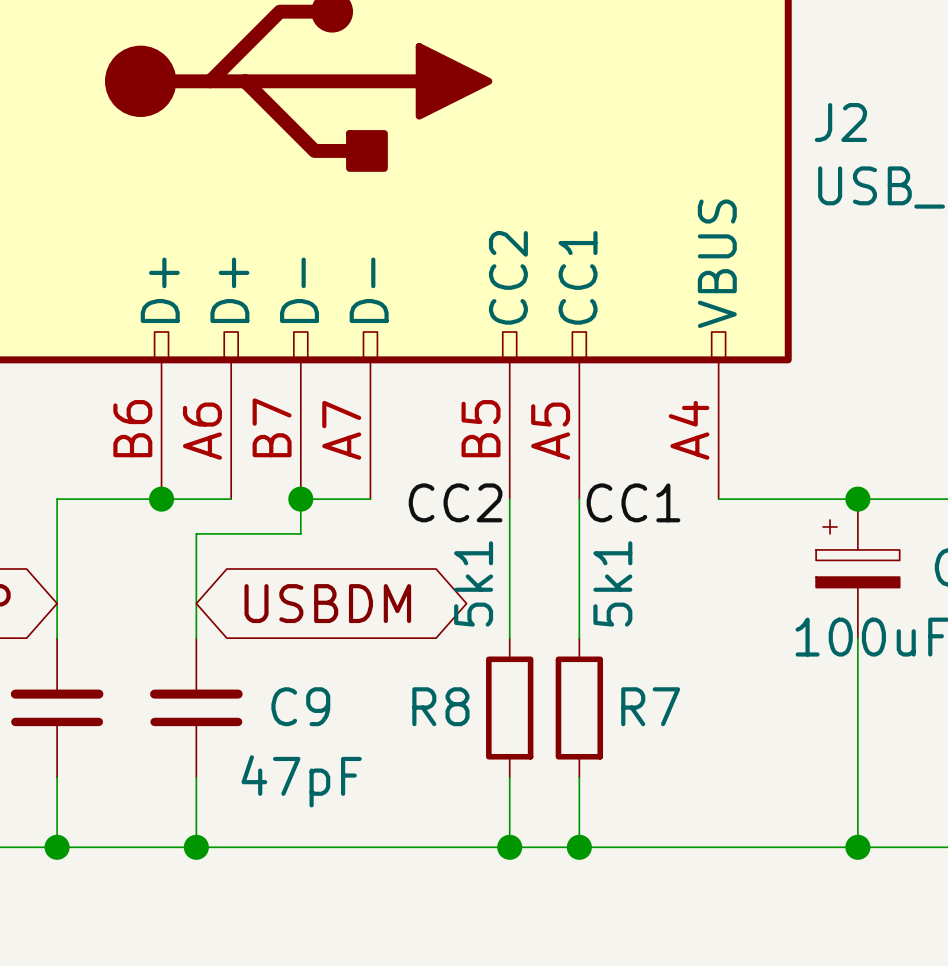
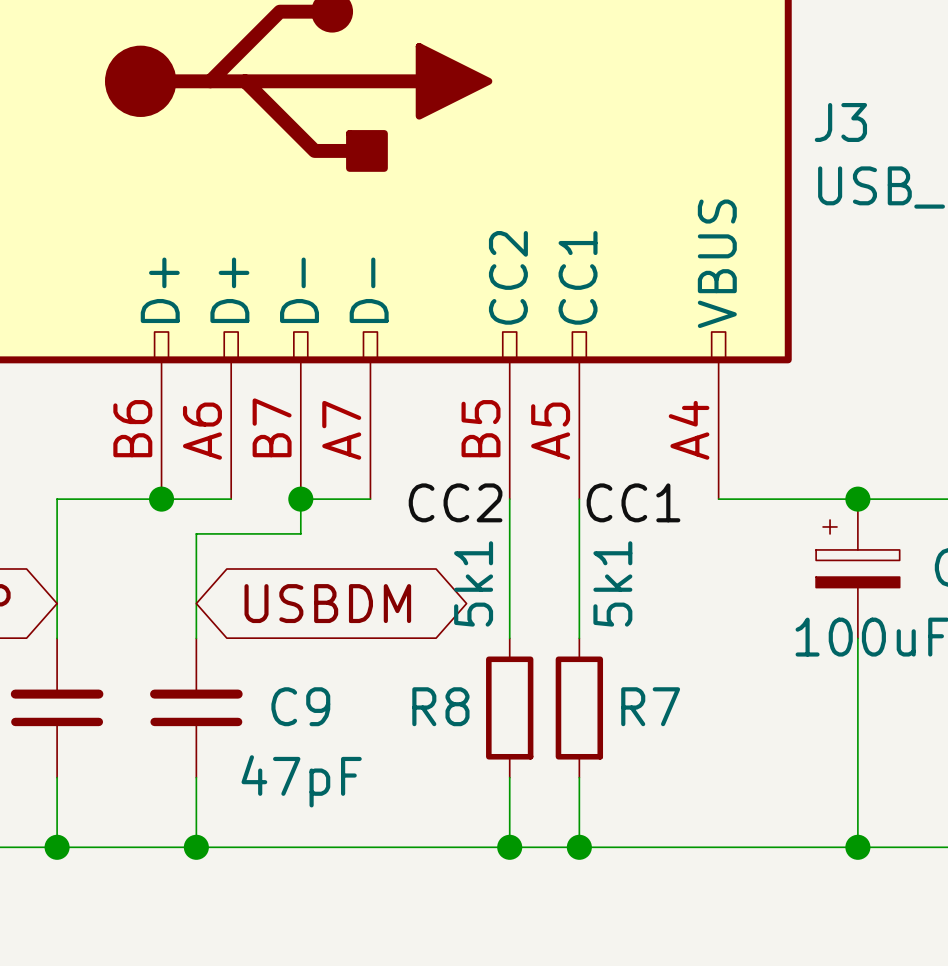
J2 name: J2 (840, 122) -> J3 (840, 122)

